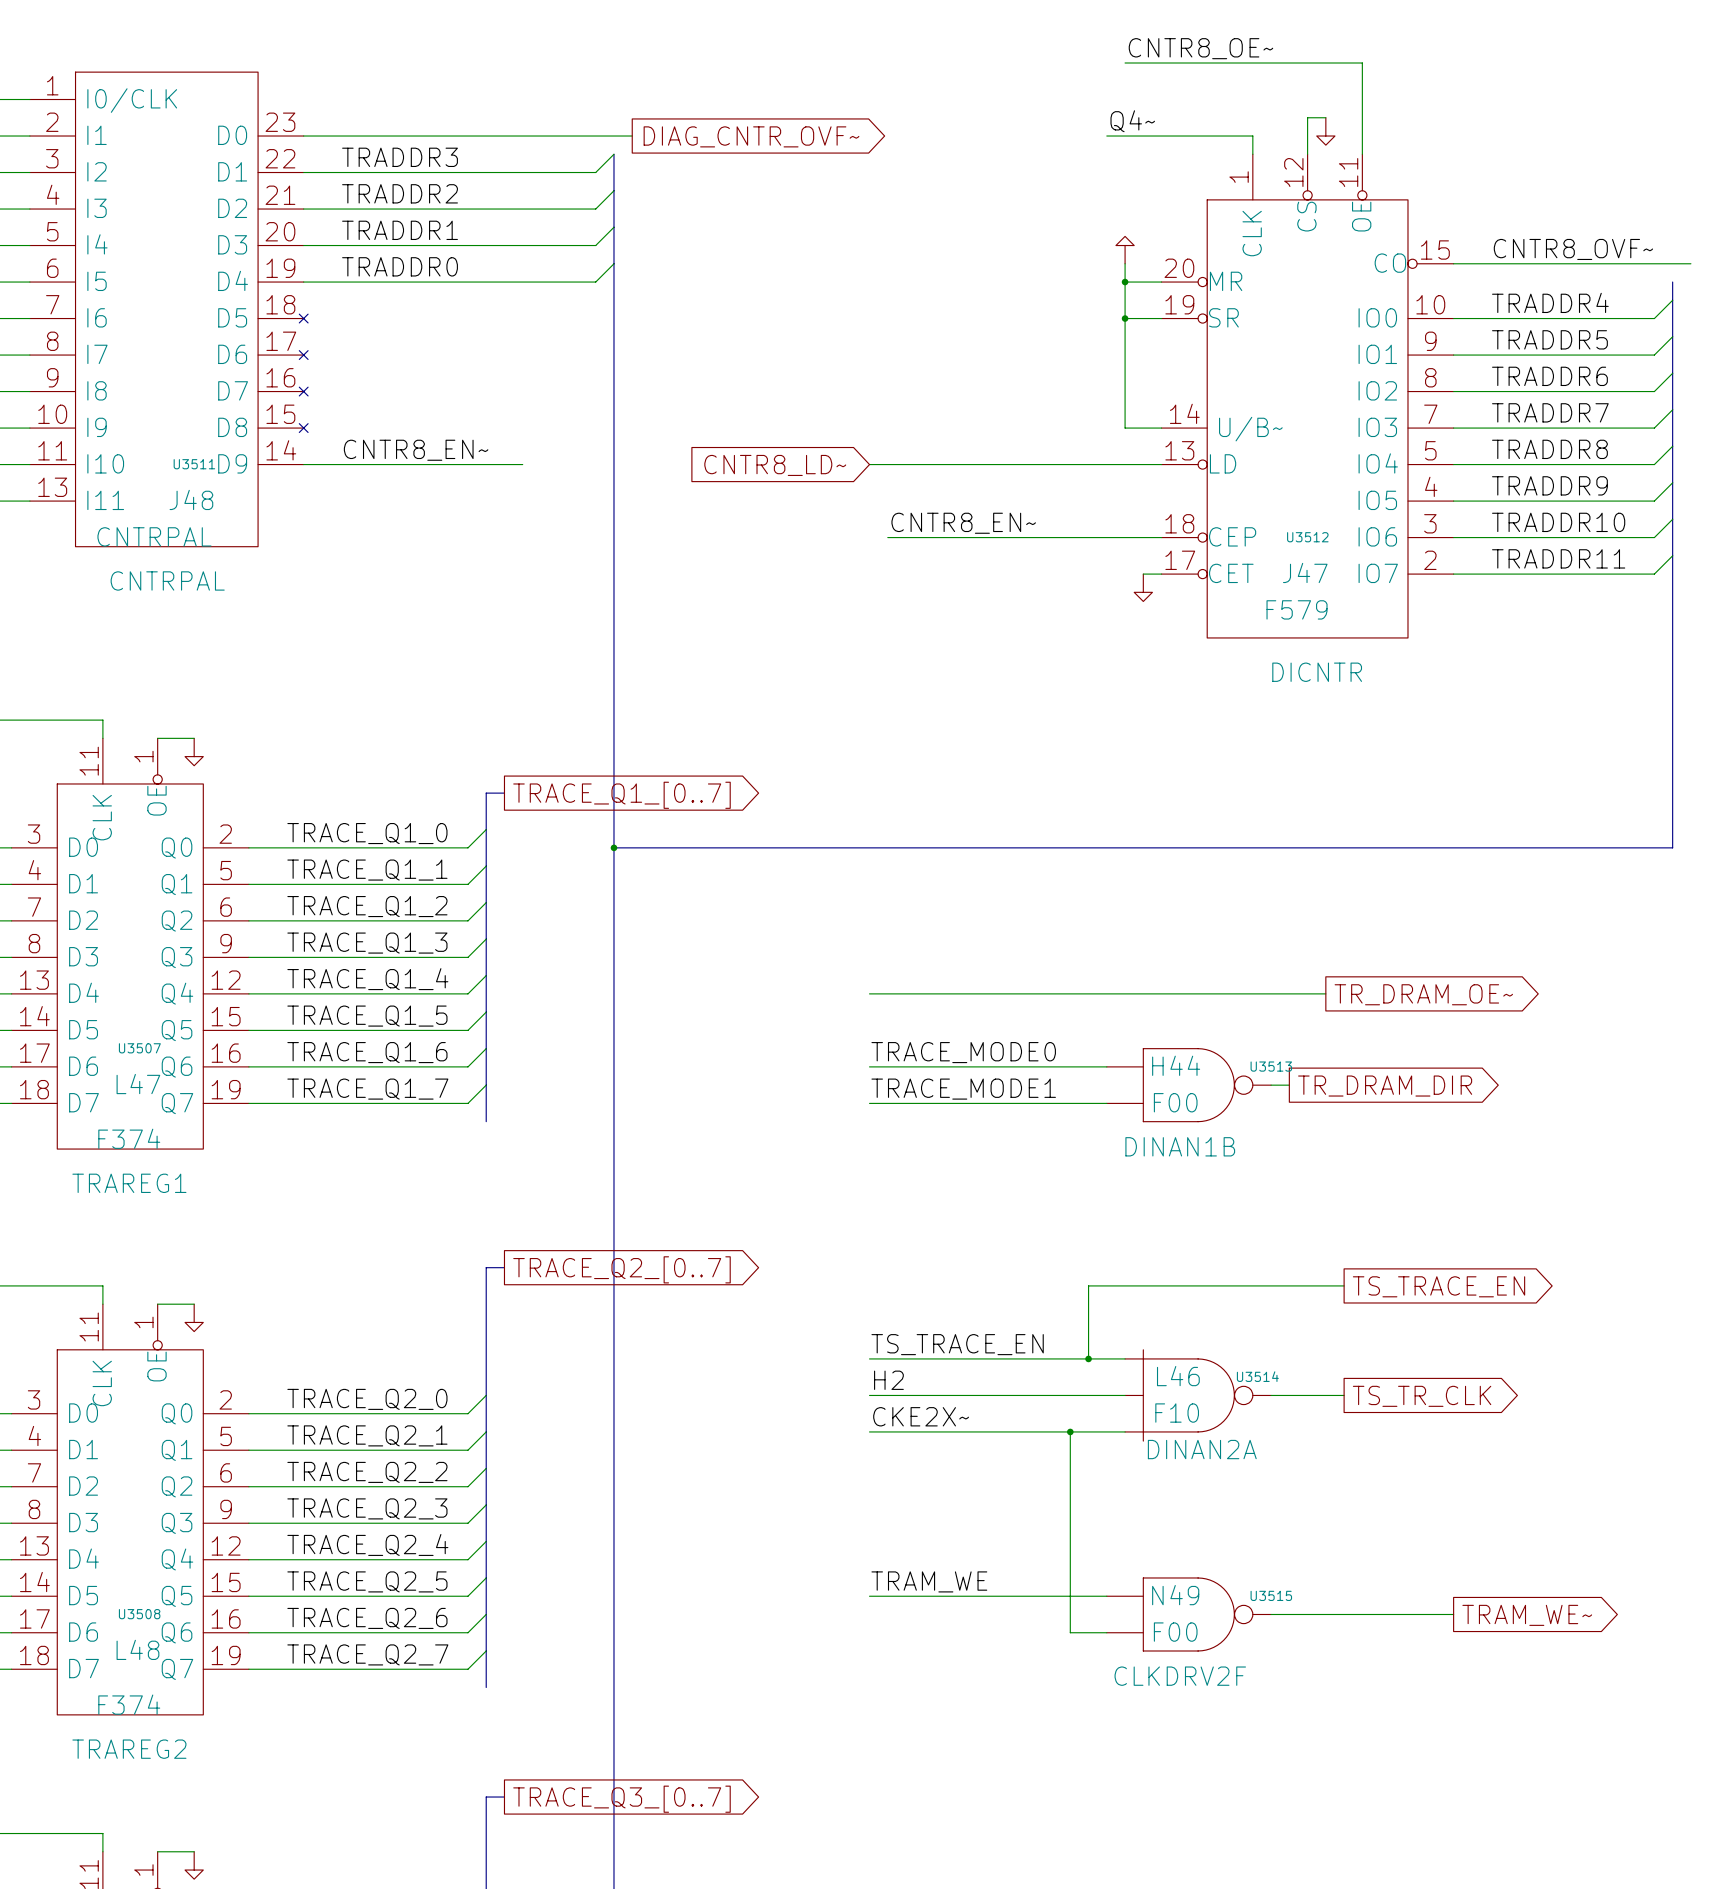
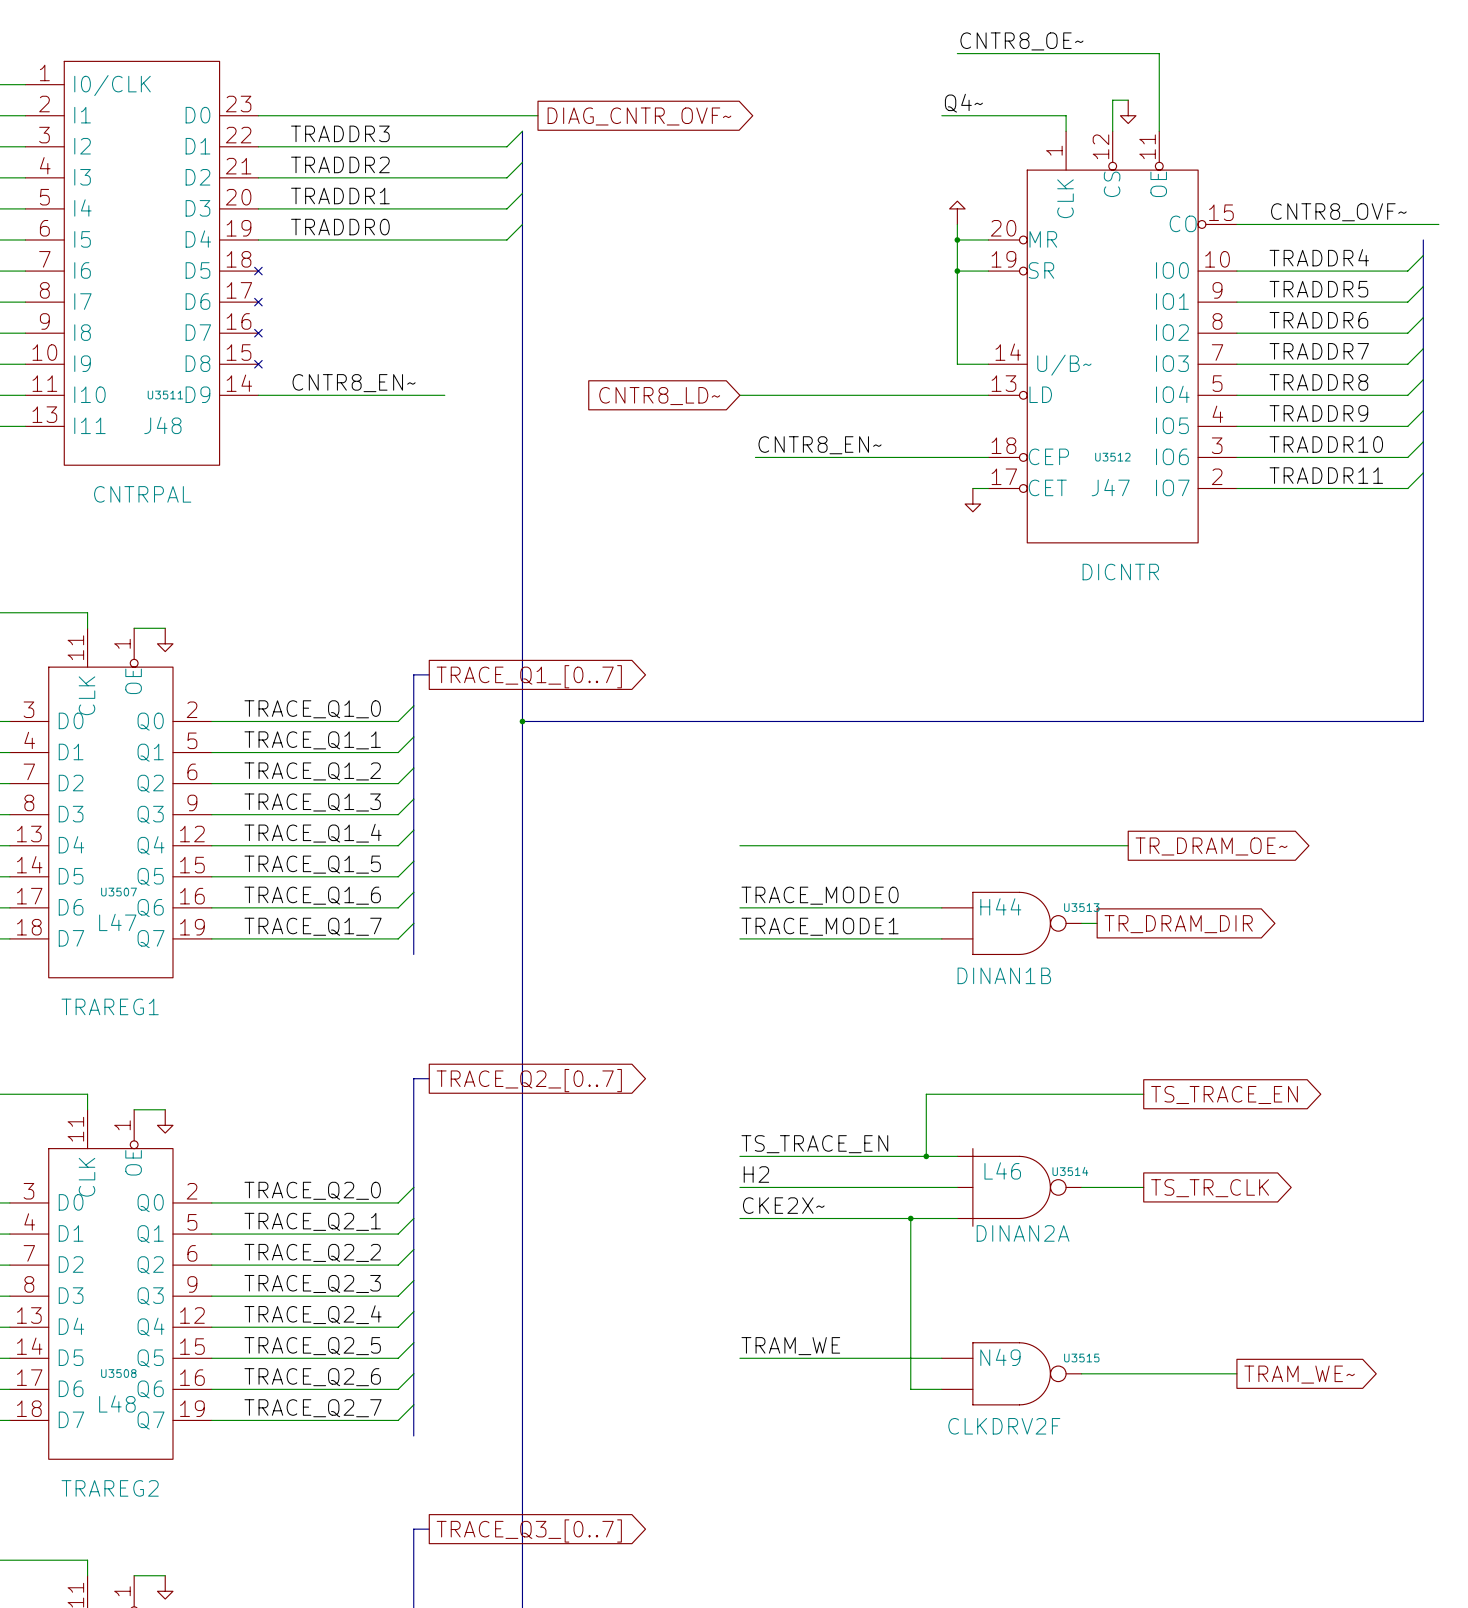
U3511 value: CNTRPAL (154, 536) -> none
U3512 value: F579 (1297, 609) -> none
U3513 value: F00 (1175, 1102) -> none
U3507 value: F374 (129, 1138) -> none
U3514 value: F10 (1177, 1413) -> none
U3515 value: F00 (1175, 1632) -> none
U3508 value: F374 (129, 1704) -> none

